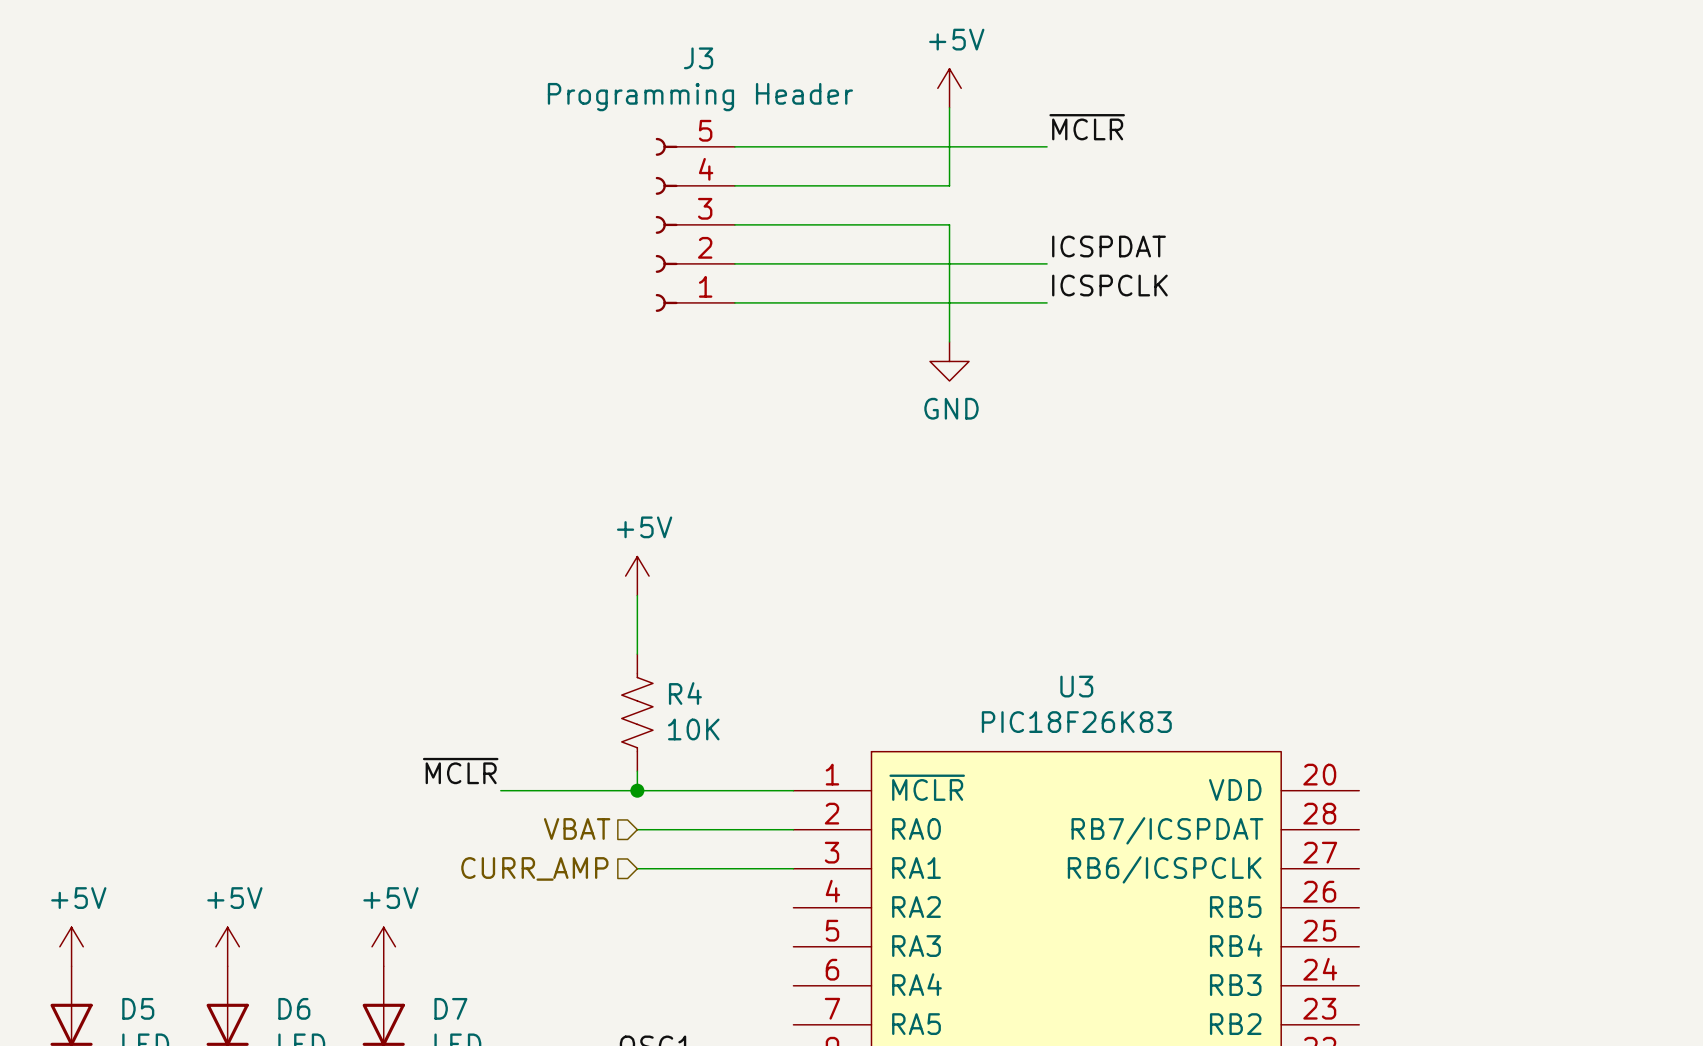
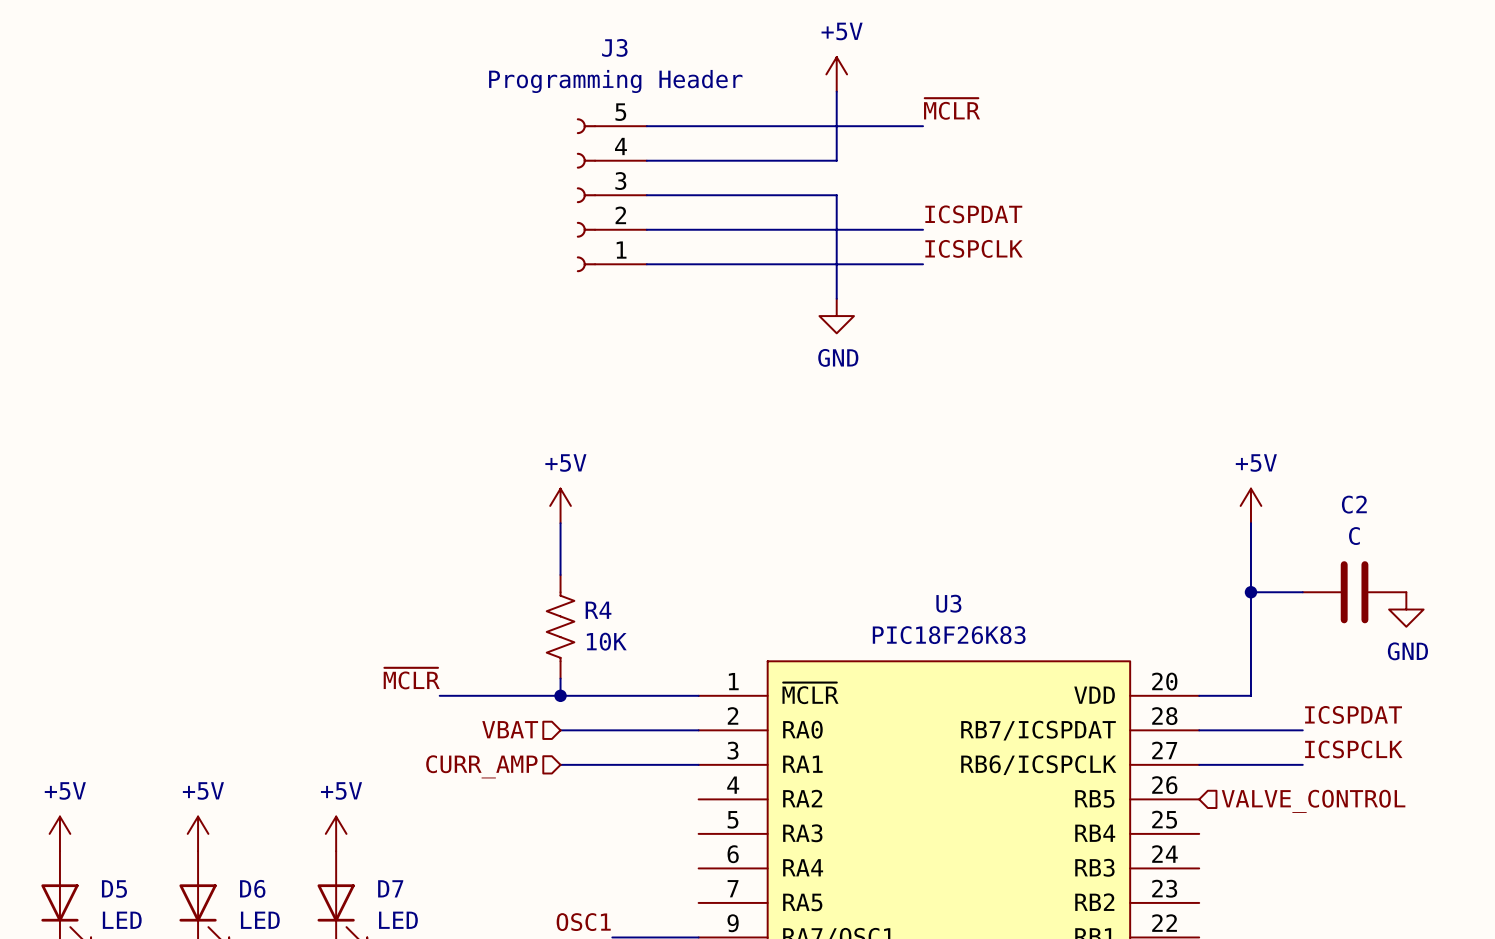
power symbol: none -> +5V (1250, 505)
wire: none -> (1250, 523) (1250, 695) (1199, 695)
wire: none -> (1250, 592) (1302, 592)
junction: none -> (1250, 592)
C2: none -> C (1354, 592)
power symbol: none -> GND (1406, 609)
label: none -> ICSPDAT (1353, 714)
wire: none -> (1199, 730) (1302, 730)
label: none -> ICSPCLK (1353, 749)
wire: none -> (1199, 764) (1302, 764)
hierarchical label: none -> VALVE_CONTROL (1313, 801)

